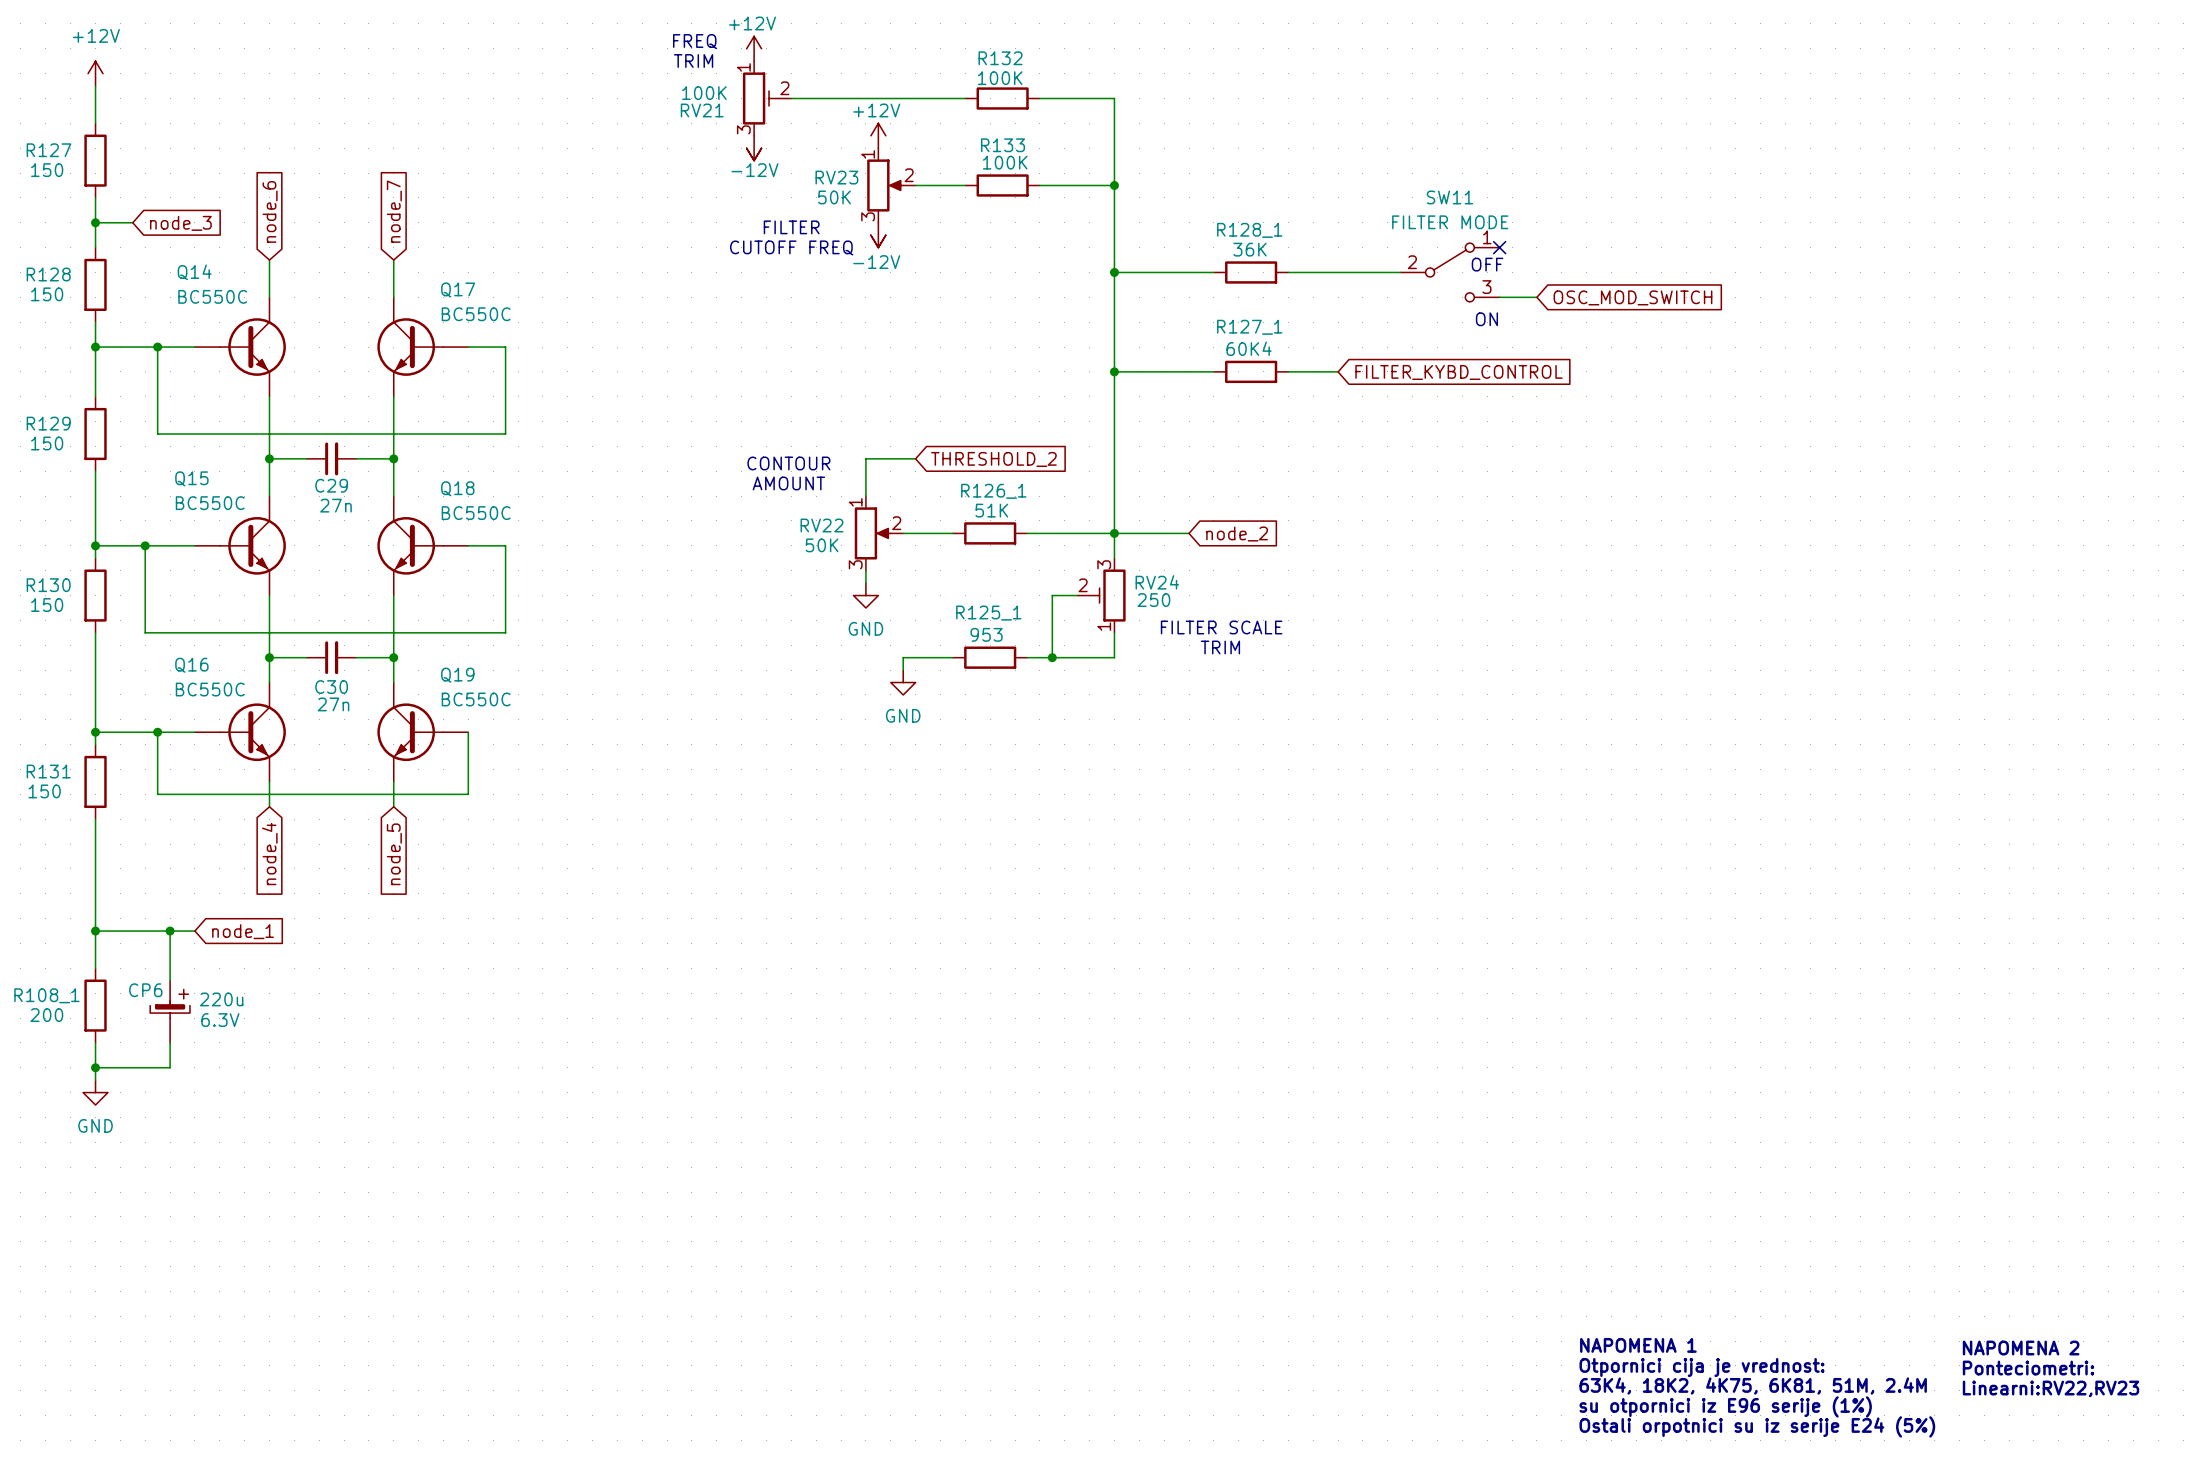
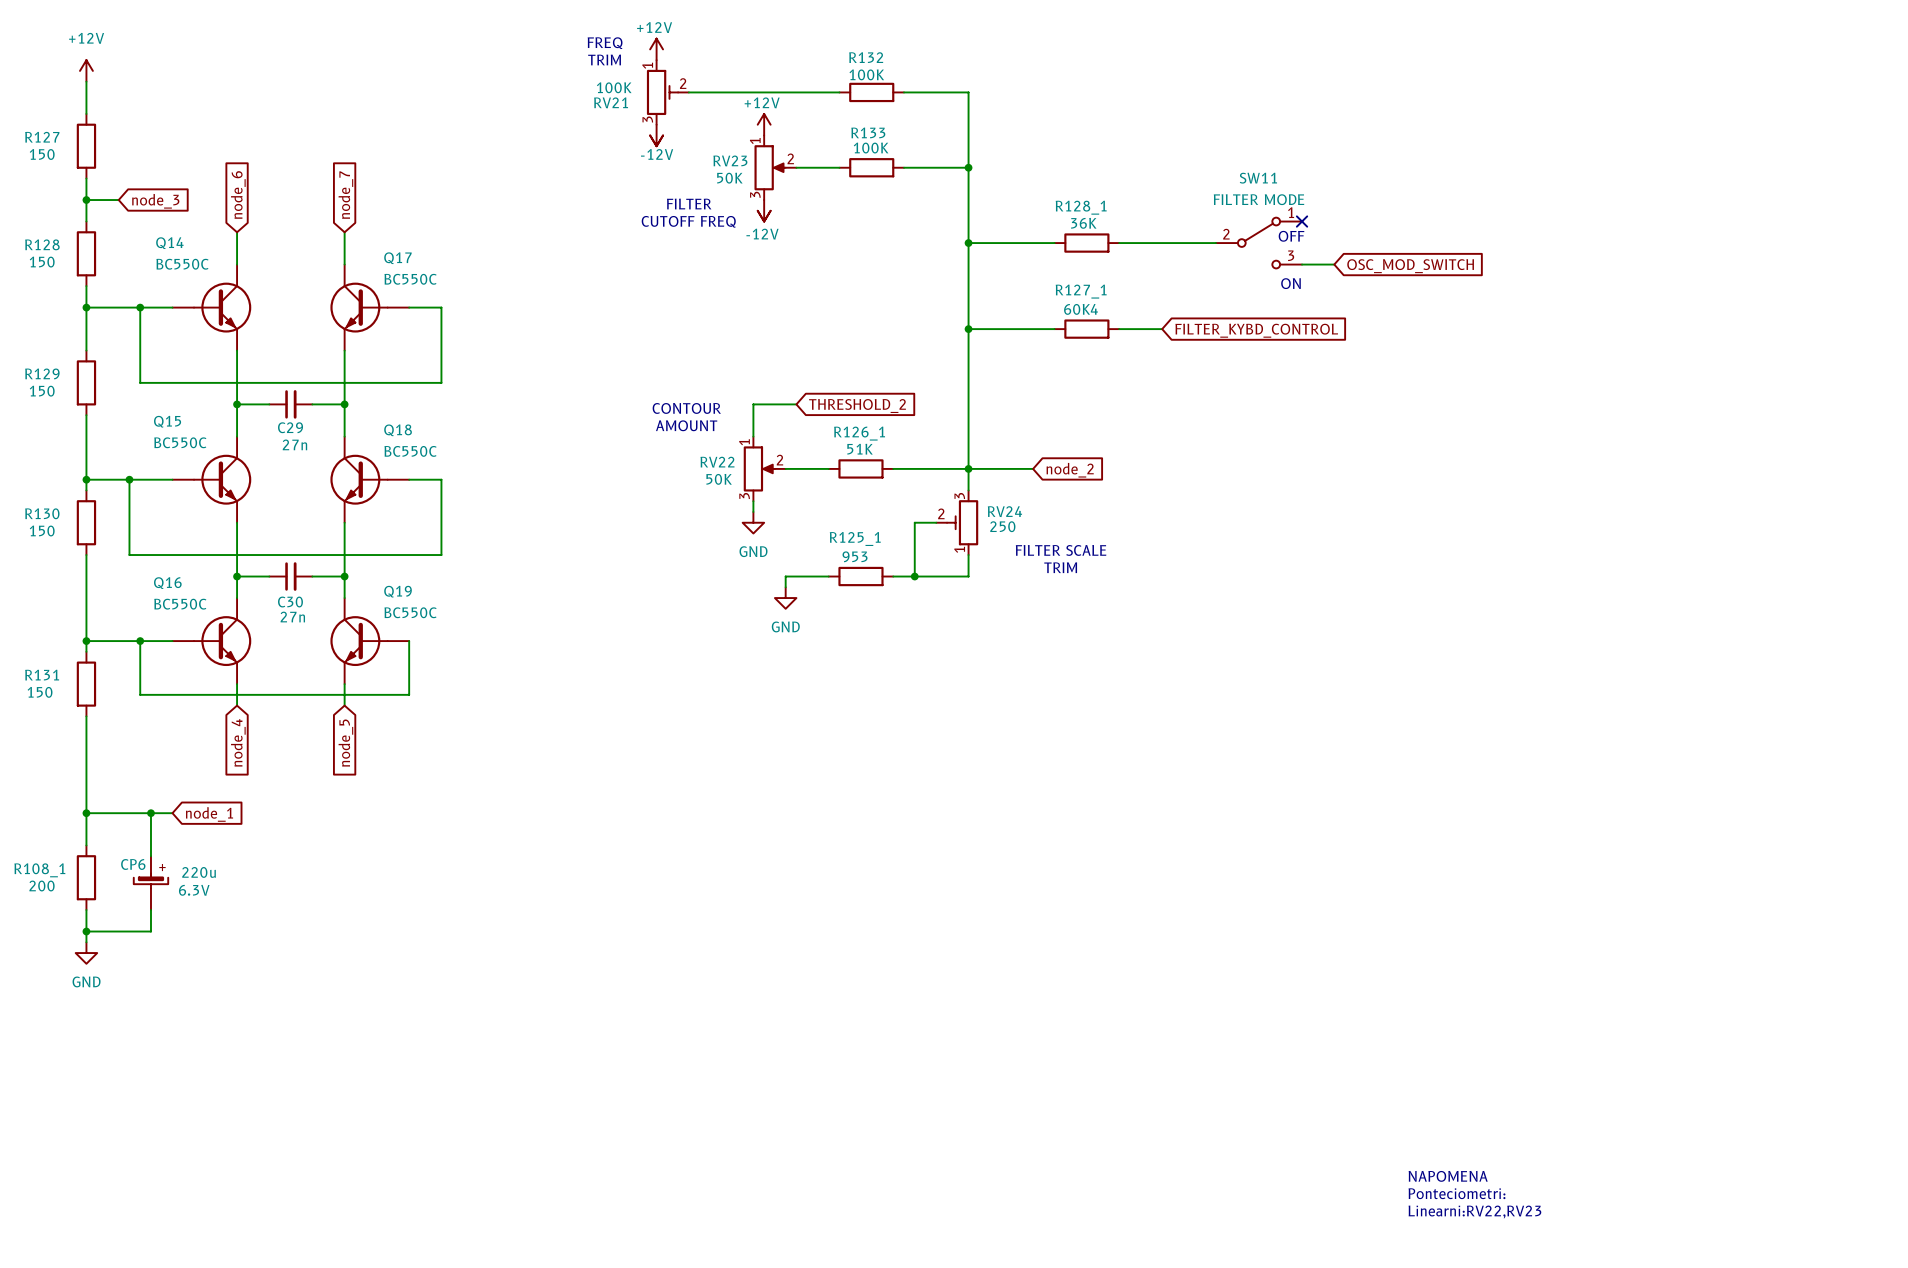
text: NAPOMENA 1 (1638, 1345) -> NAPOMENA (1448, 1176)
text: NAPOMENA 2 (2021, 1348) -> none
text: Otpornici cija je vrednost: (1702, 1367) -> none
text: Ponteciometri: (2028, 1368) -> none
text: none -> Ponteciometri: (1457, 1193)
text: 63K4, 18K2, 4K75, 6K81, 51M, 2.4M (1753, 1386) -> none
text: Linearni:RV22,RV23 (2050, 1388) -> none
text: none -> Linearni:RV22,RV23 (1474, 1212)
text: su otpornici iz E96 serije (1%) (1725, 1406) -> none
text: Ostali orpotnici su iz serije E24 (5%) (1757, 1426) -> none

